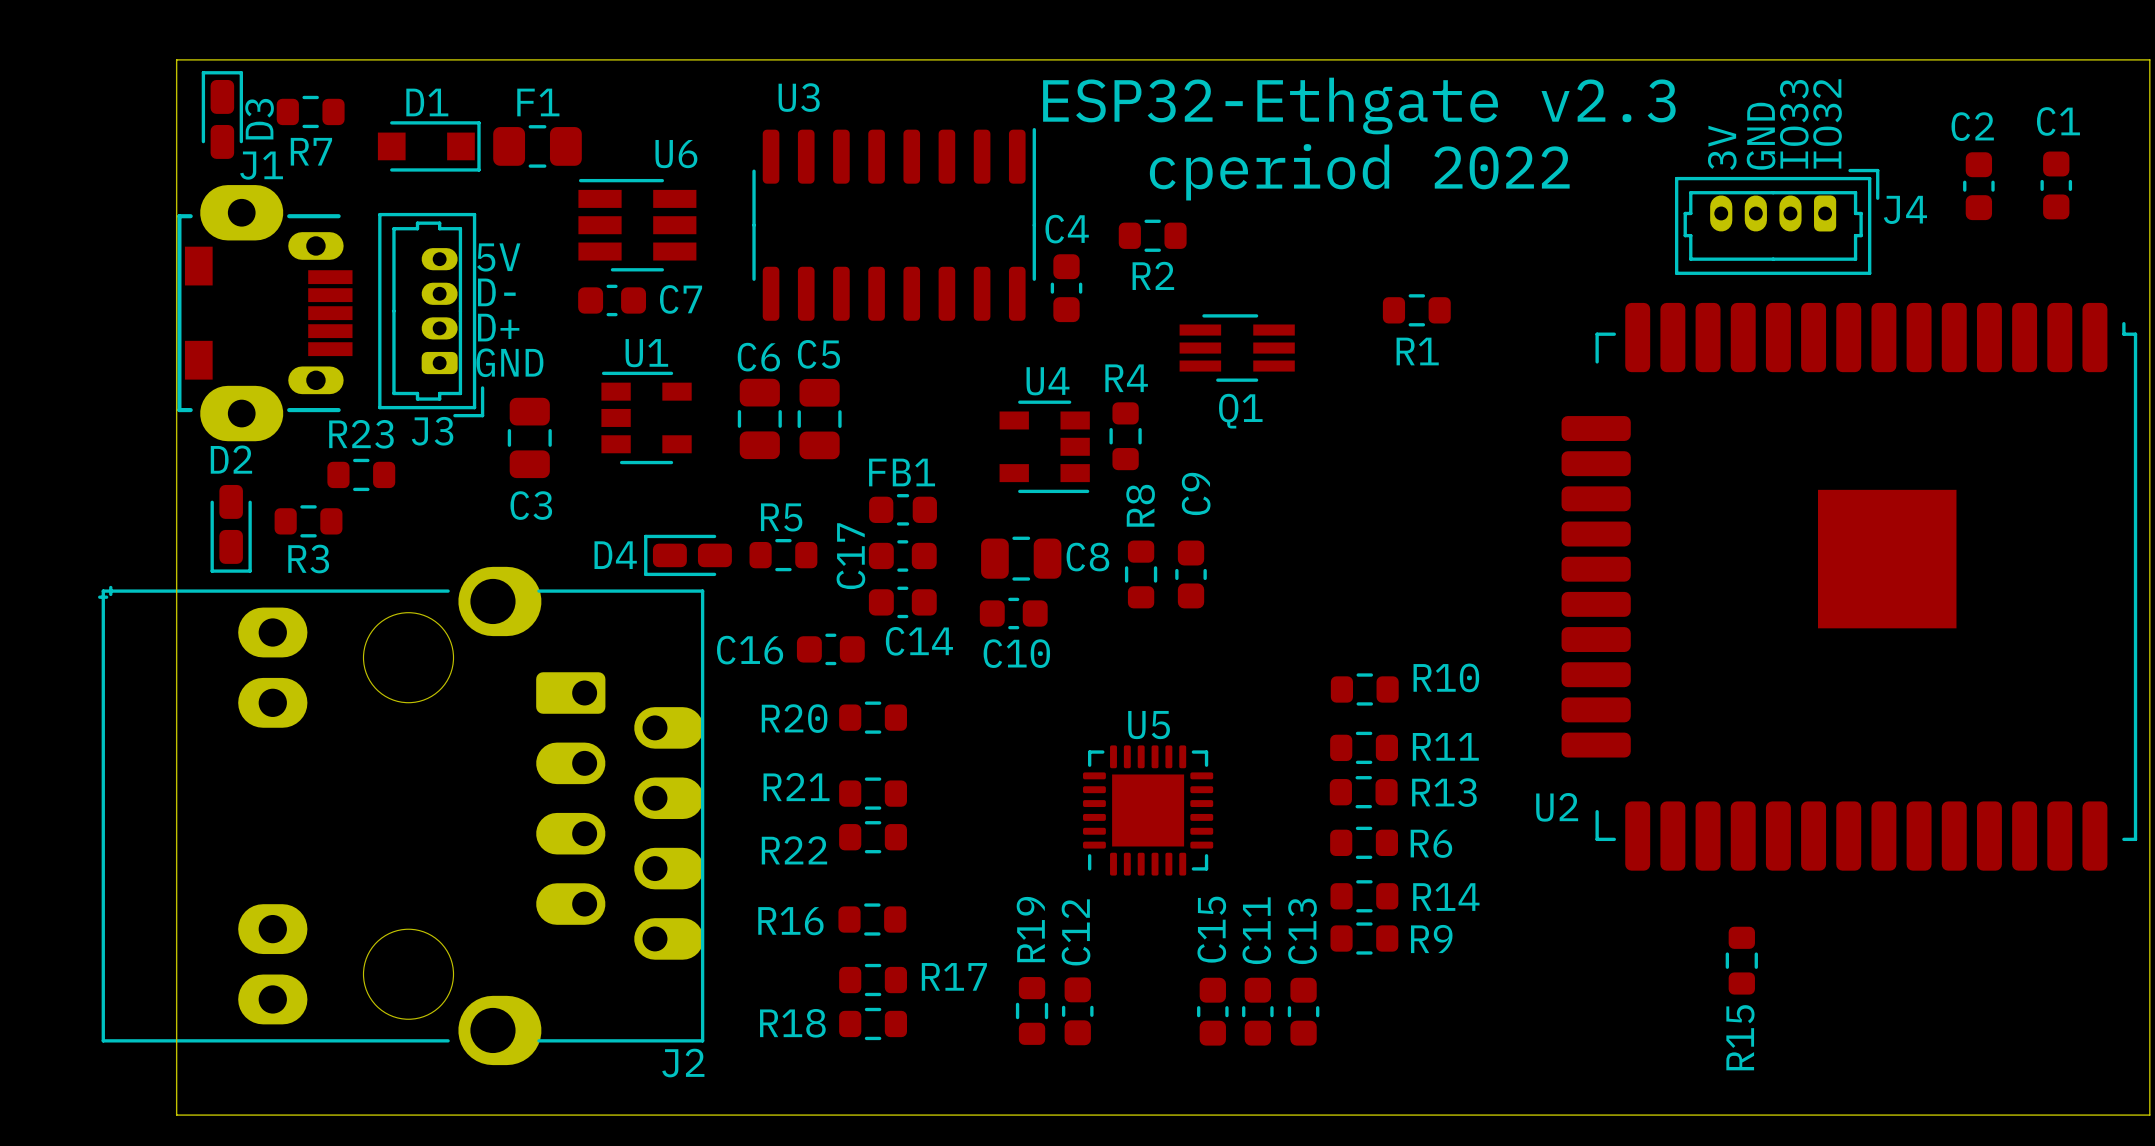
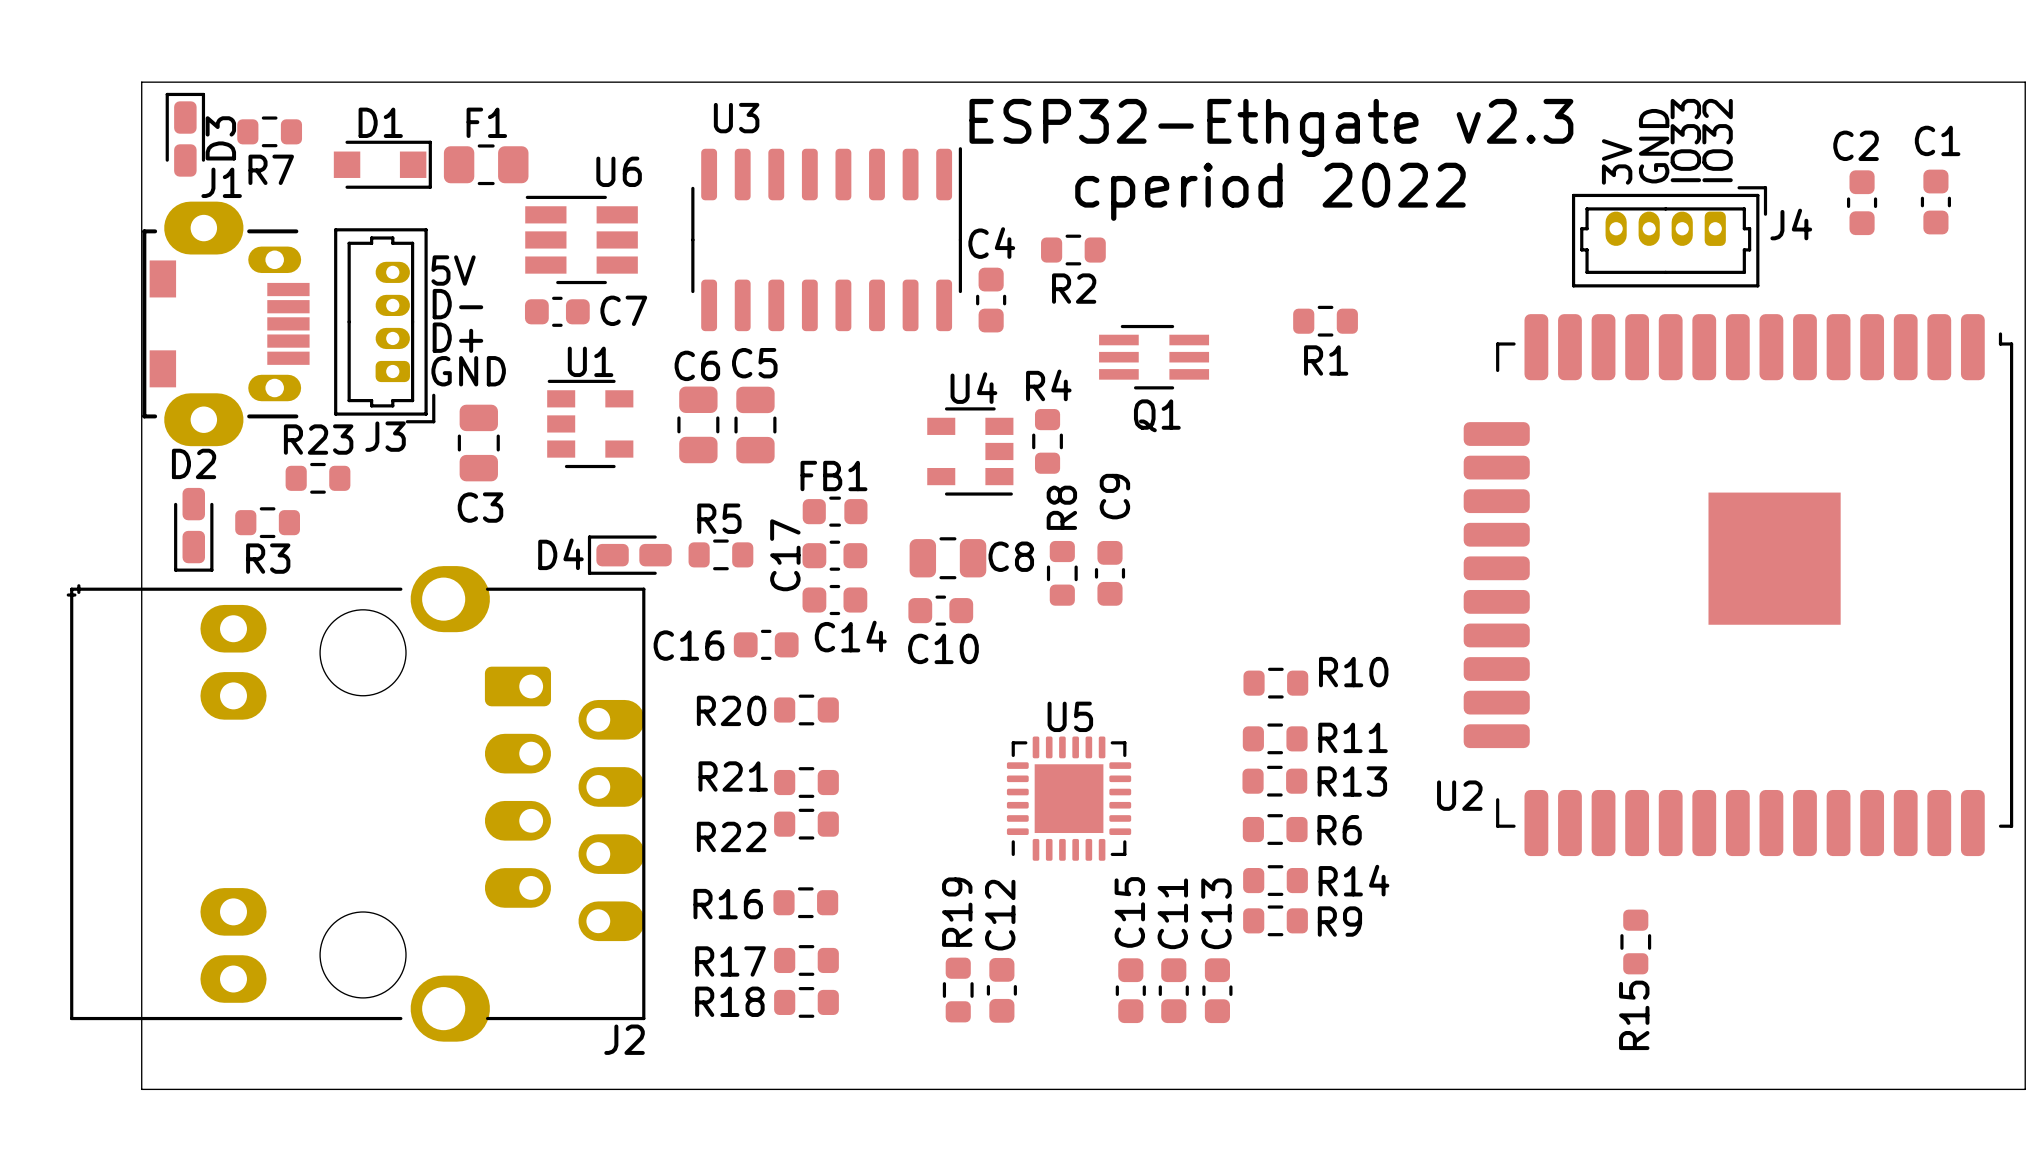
R17 name position: R17 (954, 976) -> R17 (730, 961)

